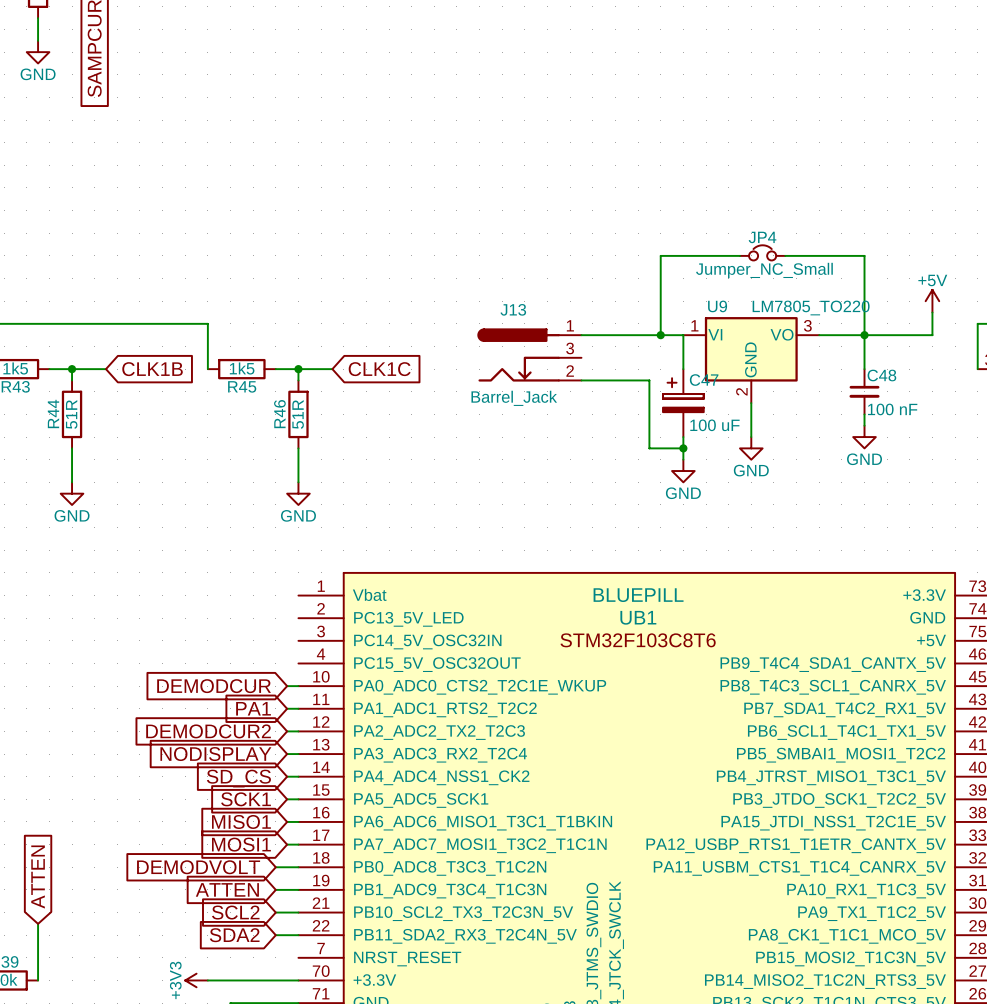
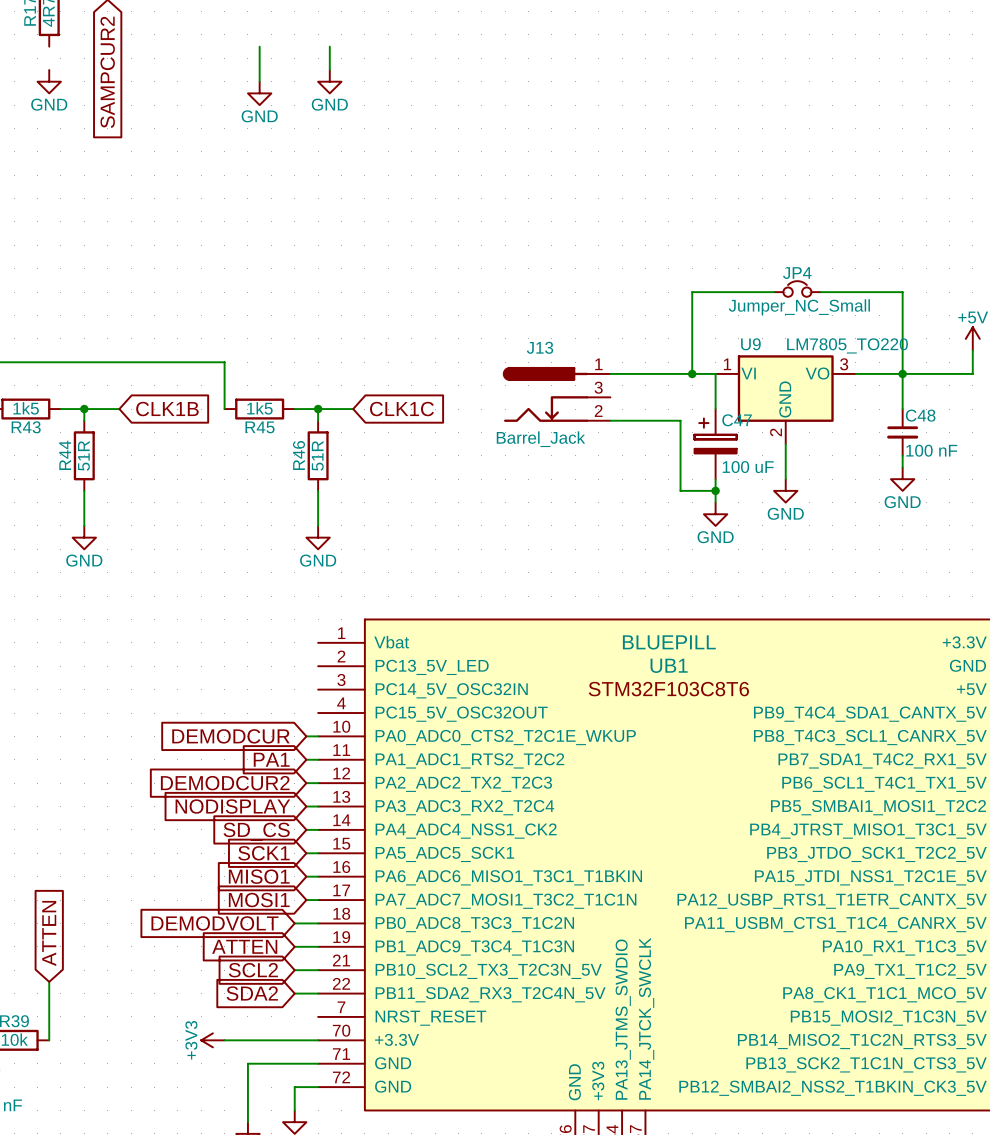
wire: (38, 18) (38, 40) -> none
wire: none -> (259, 46) (259, 81)
wire: none -> (329, 46) (329, 70)
power symbol: none -> GND (329, 81)
power symbol: none -> GND (259, 93)

